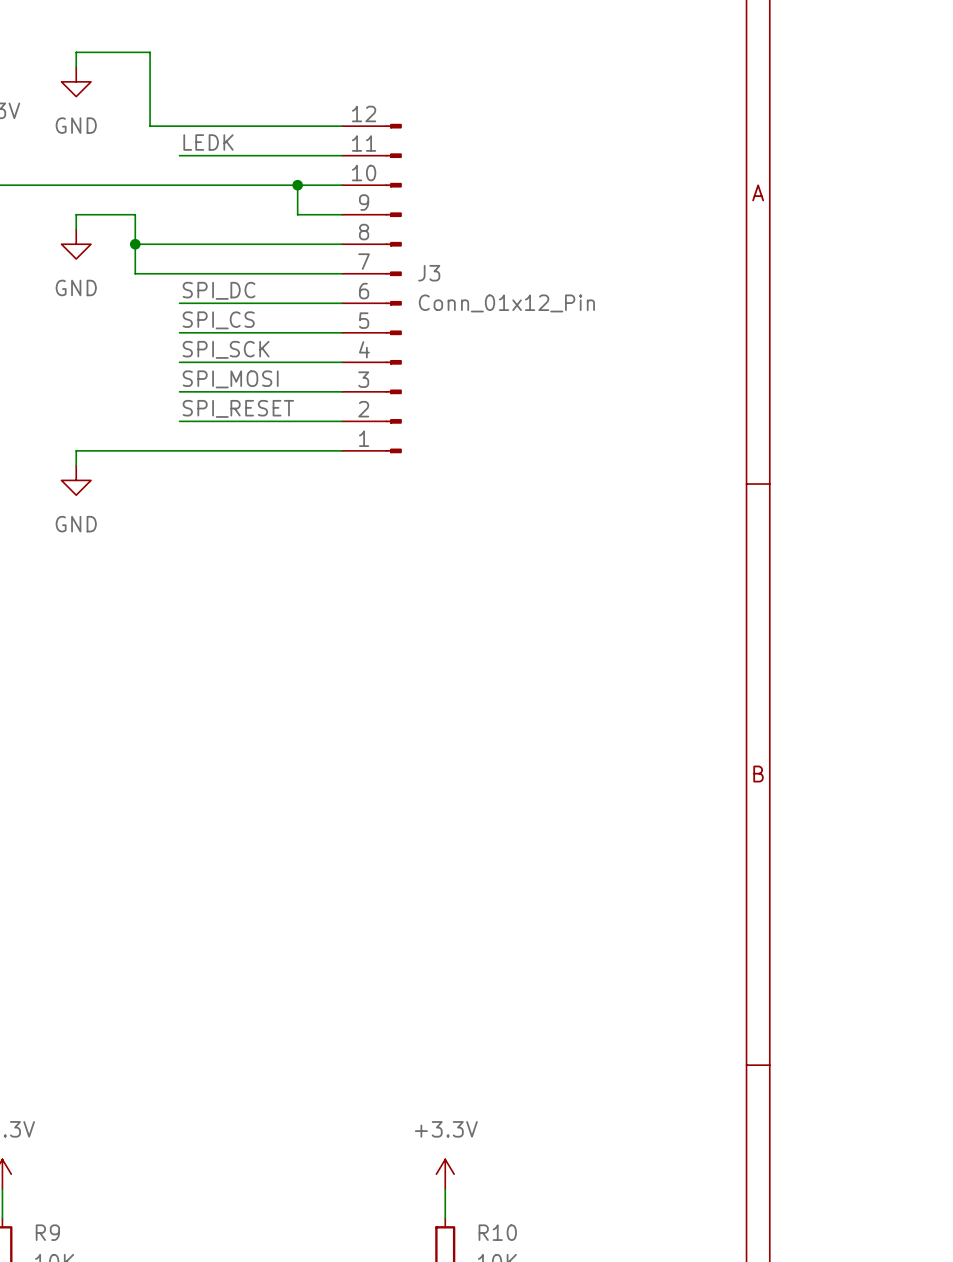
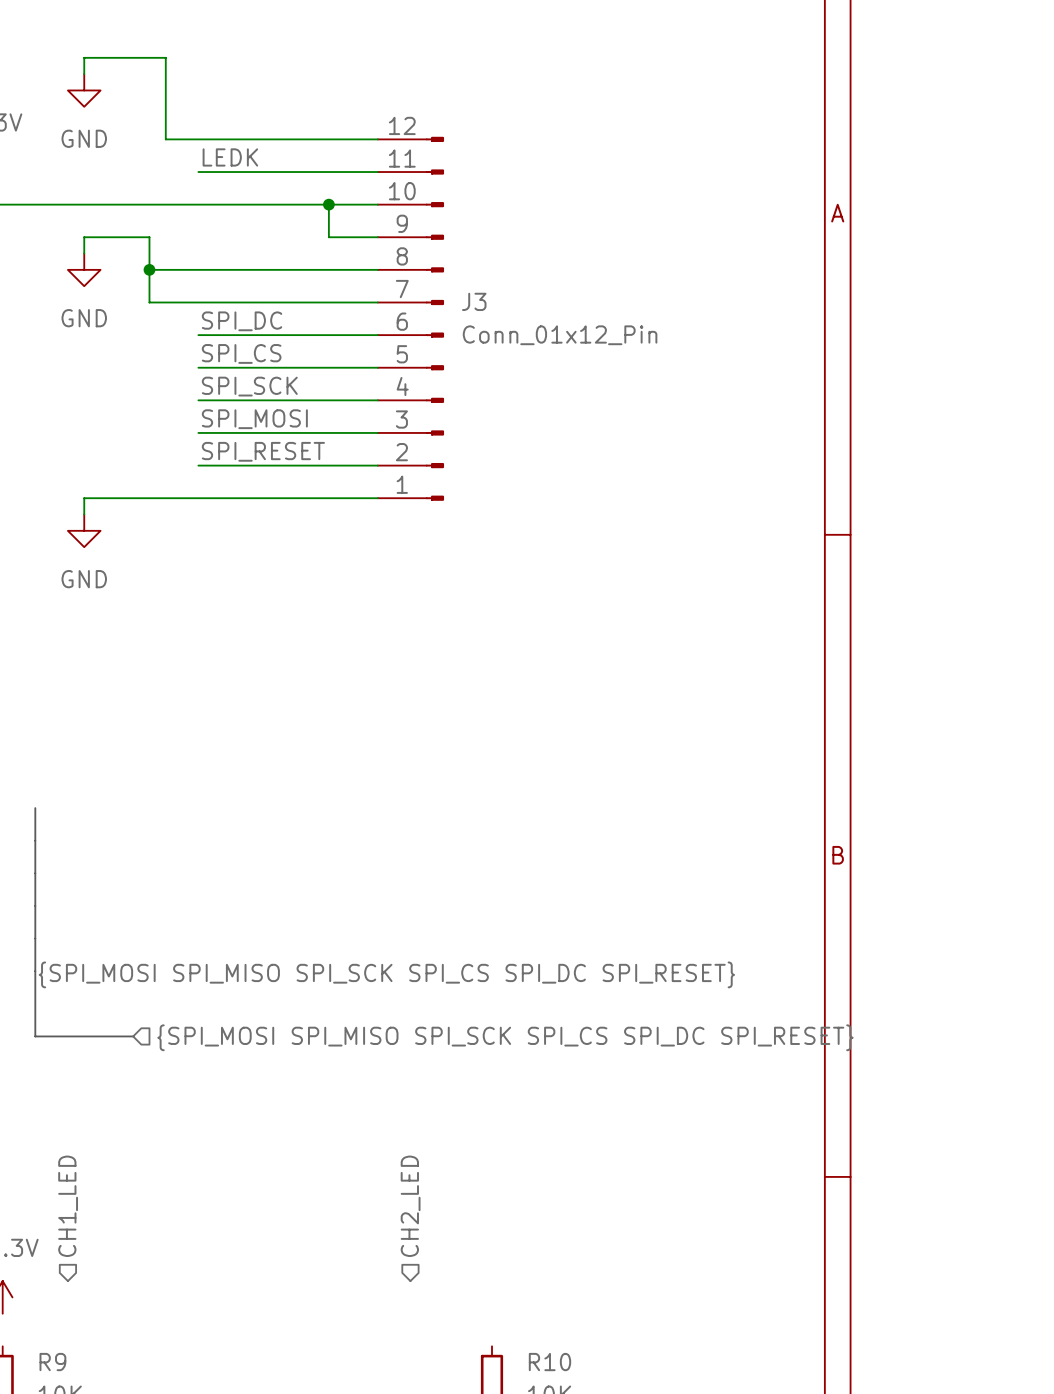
bus: none -> (35, 808) (35, 1036) (133, 1036)
label: none -> {SPI_MOSI SPI_MISO SPI_SCK SPI_CS SPI_DC SPI_RESET} (386, 974)
hierarchical label: none -> {SPI_MOSI SPI_MISO SPI_SCK SPI_CS SPI_DC SPI_RESET} (505, 1037)
hierarchical label: none -> CH1_LED (68, 1206)
hierarchical label: none -> CH2_LED (410, 1206)
power symbol: +3.3V (445, 1174) -> none
wire: (2, 1188) (2, 1218) -> none
wire: (445, 1188) (445, 1218) -> none

